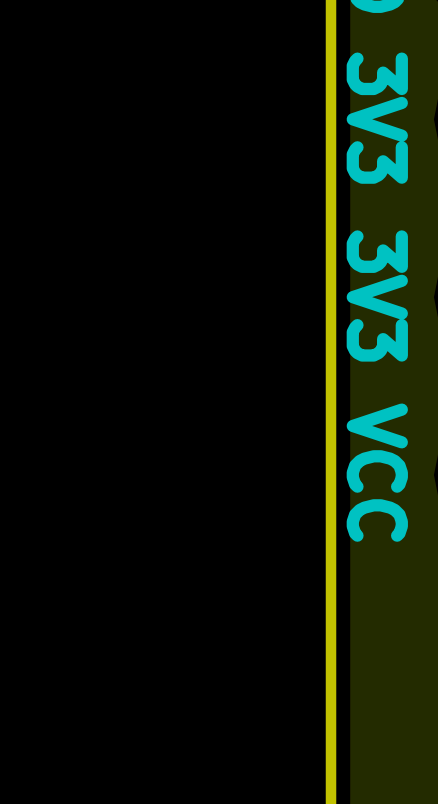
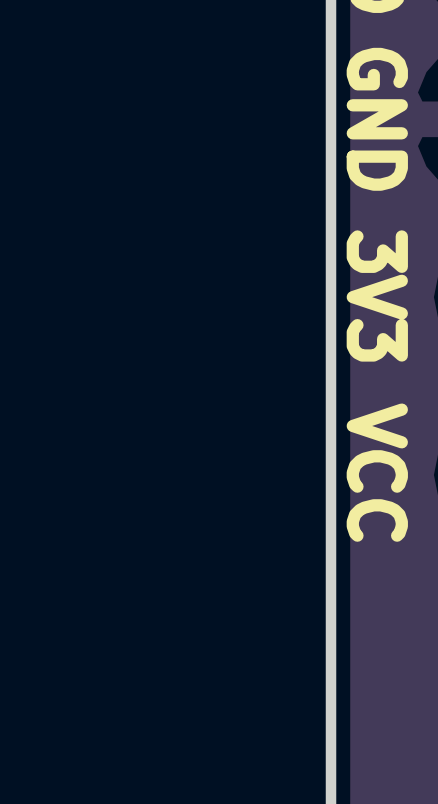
text: 3V3 (377, 118) -> GND (377, 119)

